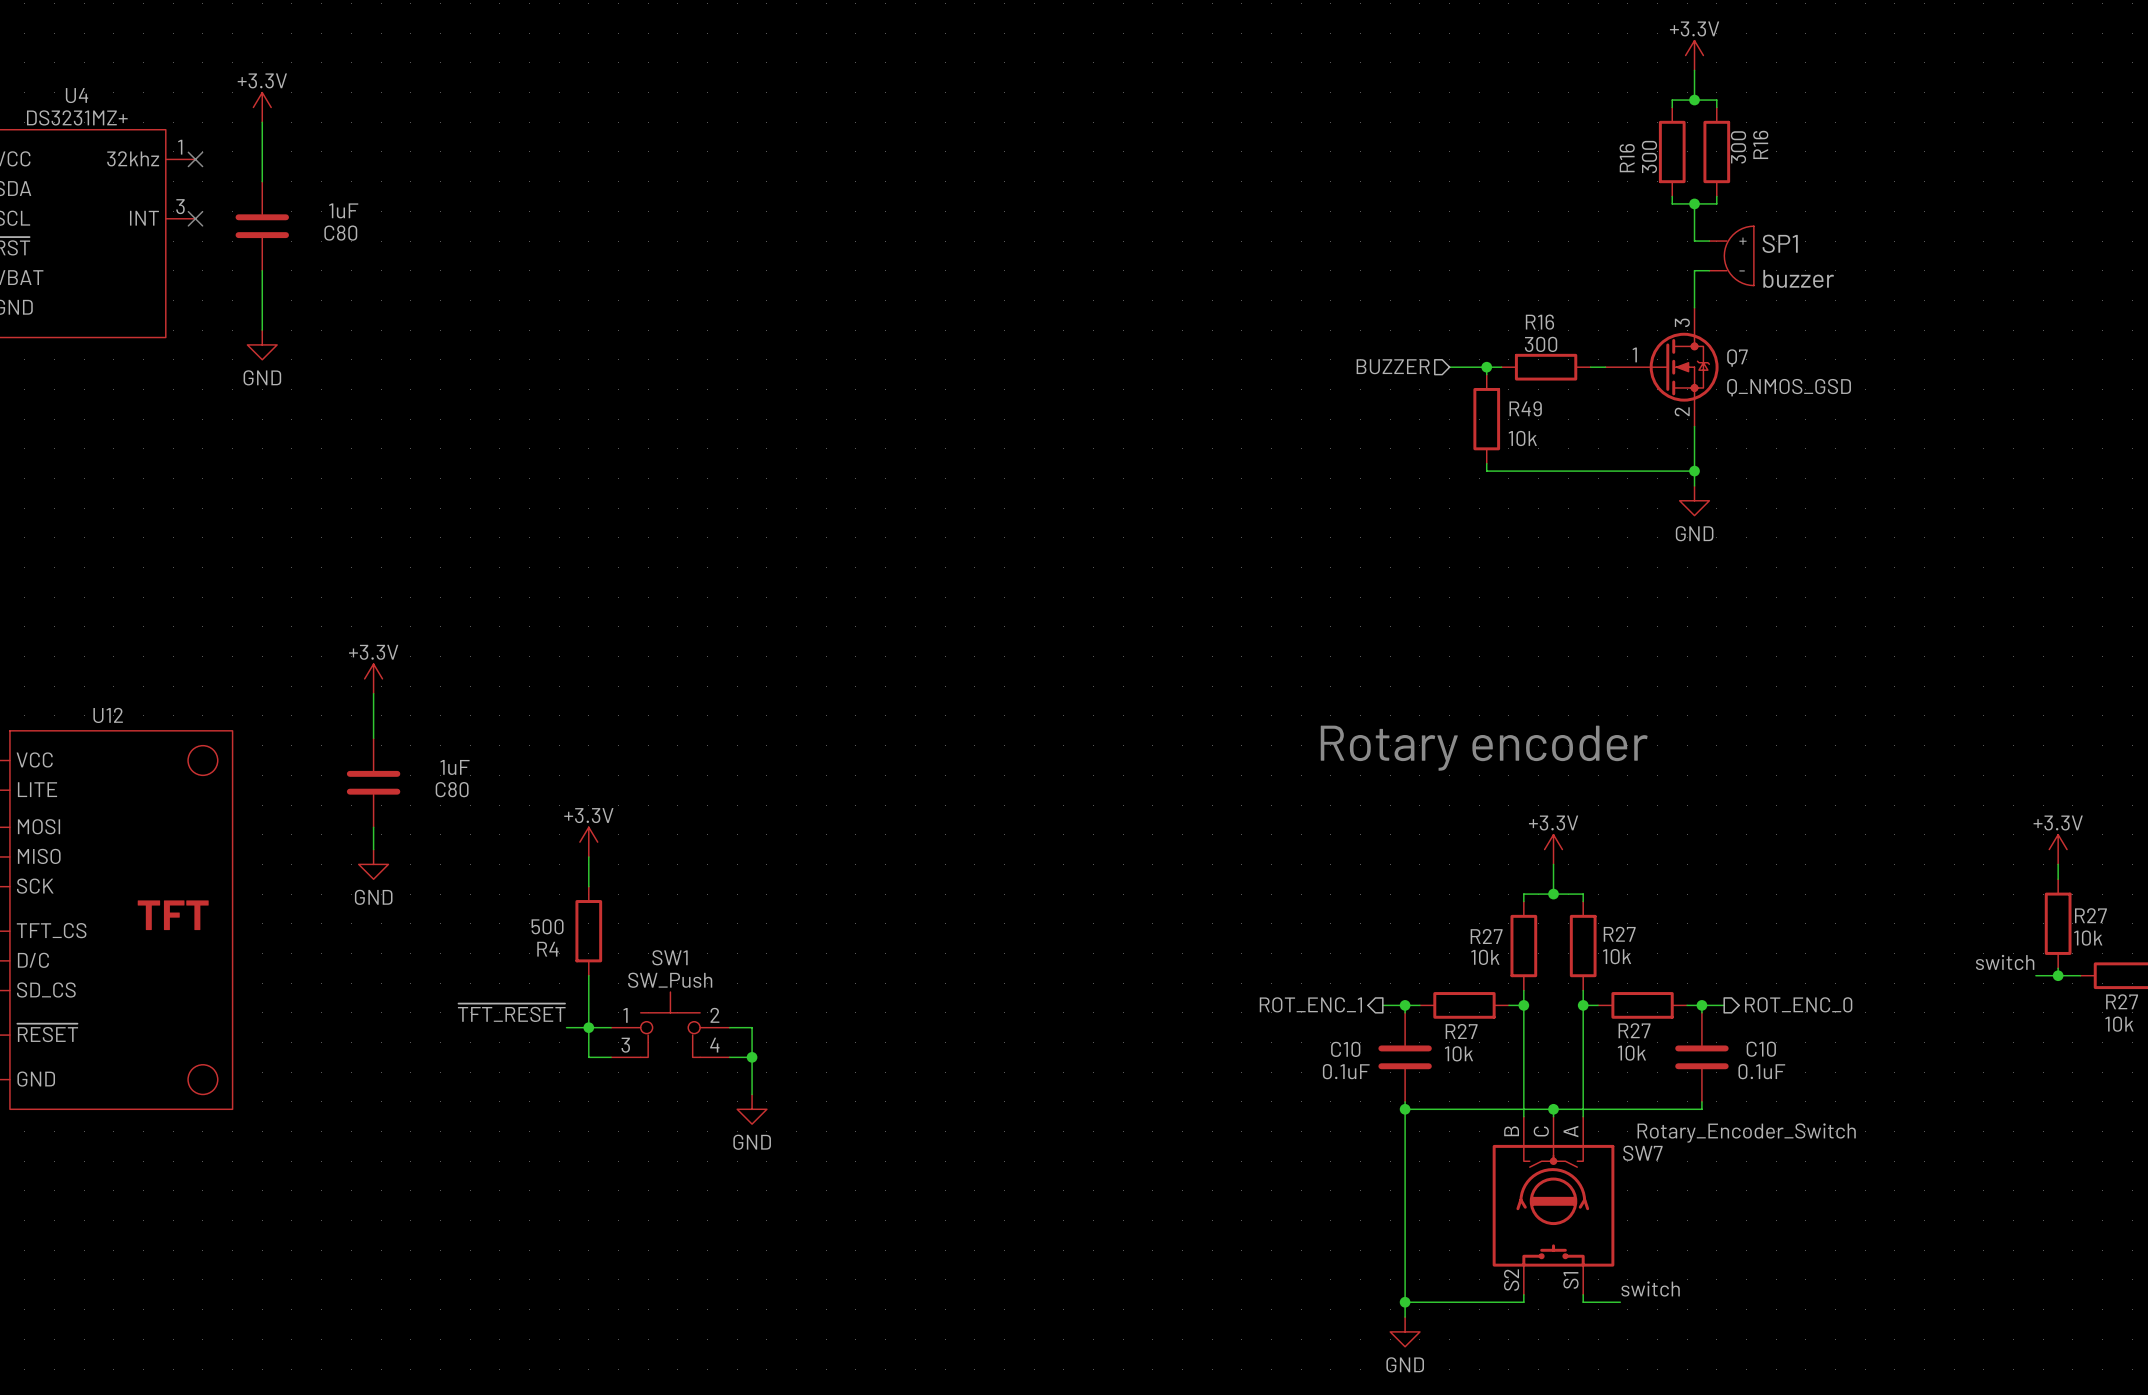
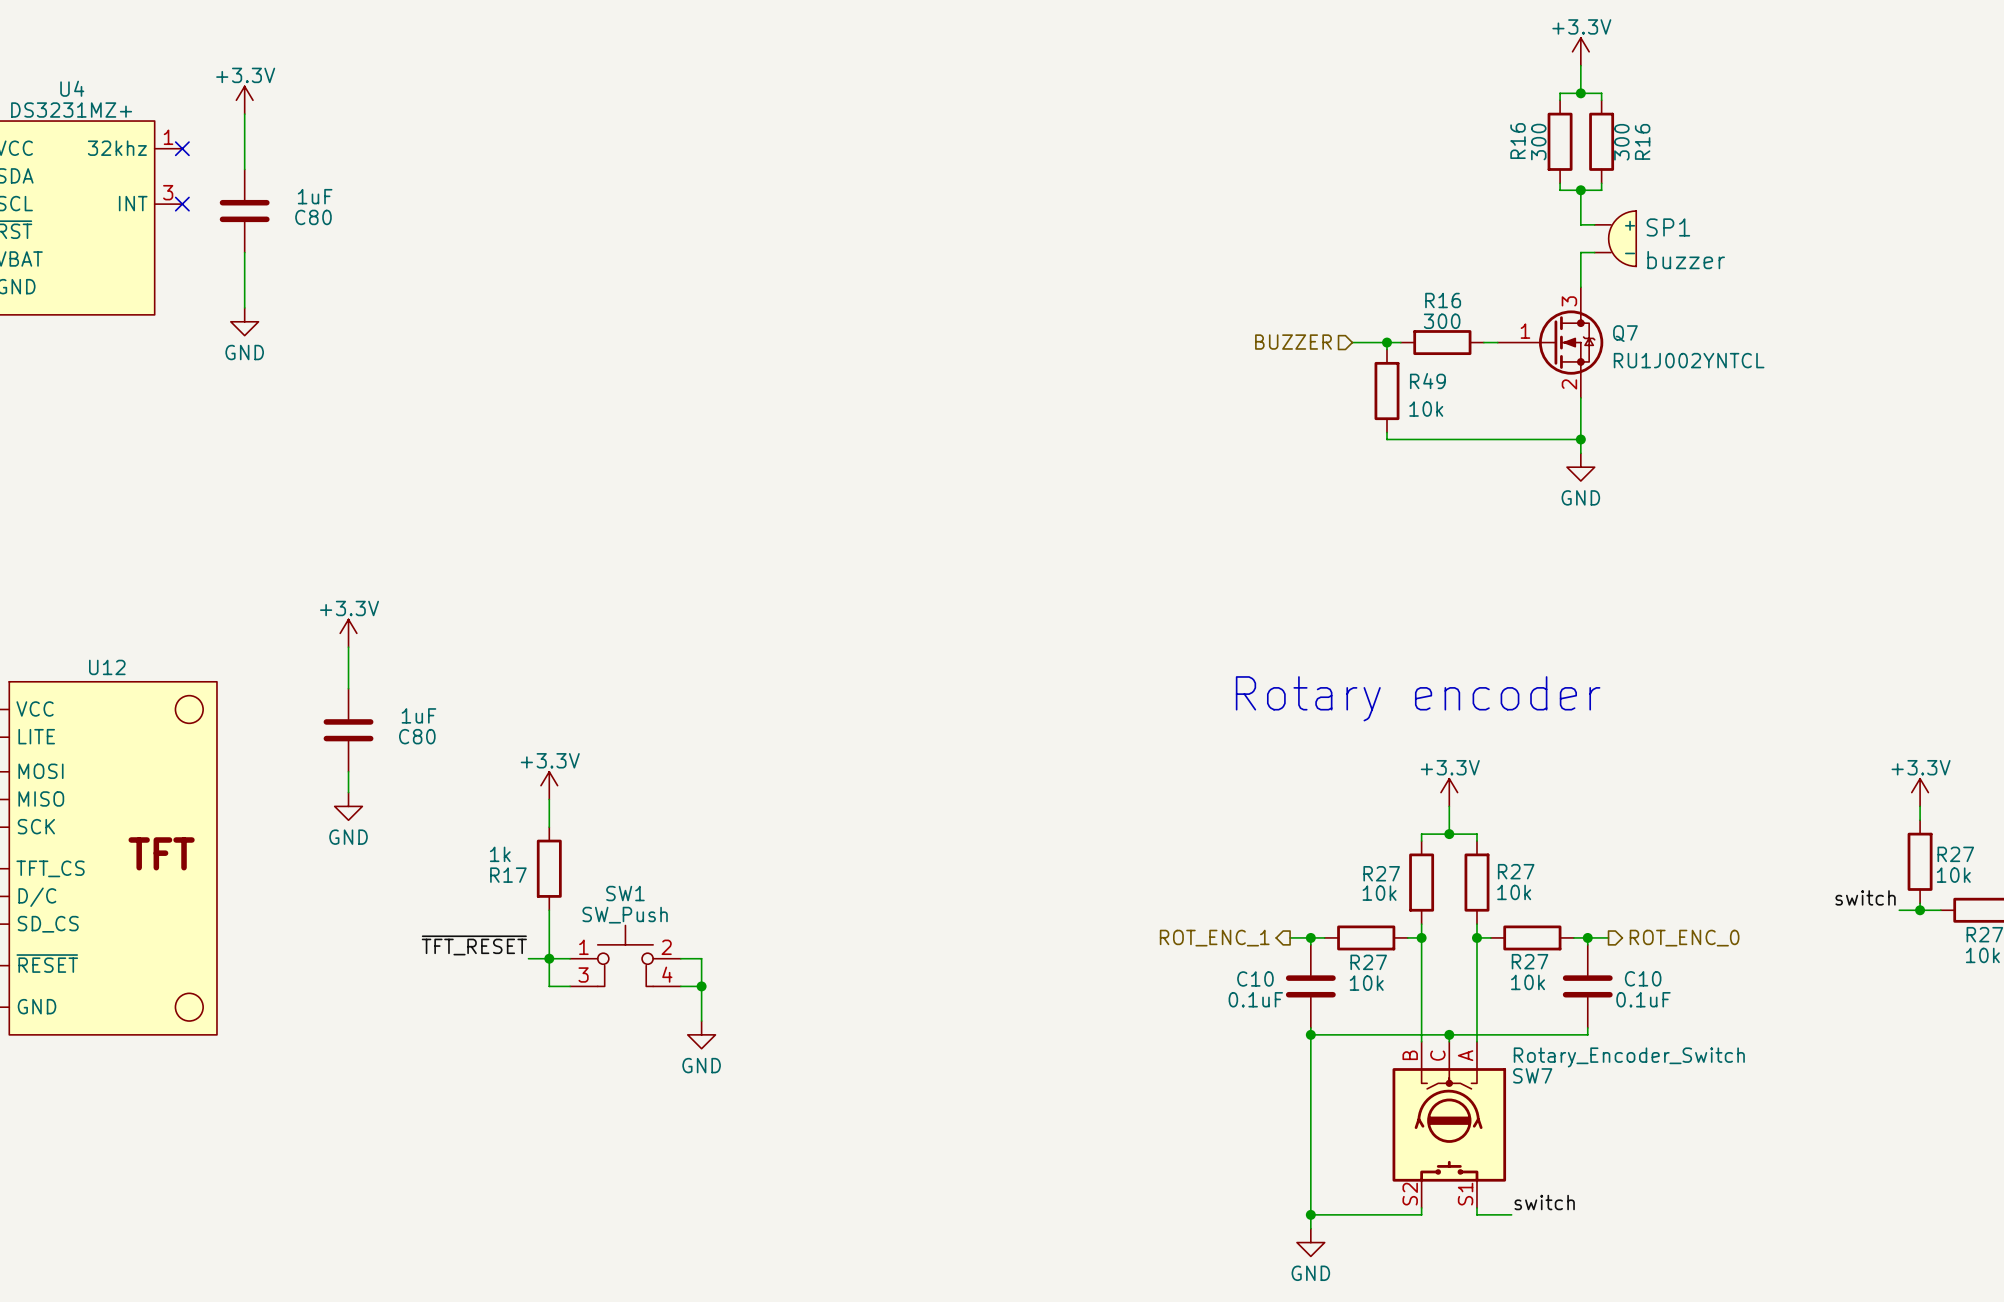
Q7 value: Q_NMOS_GSD (1789, 387) -> RU1J002YNTCL (1689, 360)
R4 value: 500 (547, 926) -> 1k (500, 854)
R4 name: R4 (547, 949) -> R17 (508, 875)

